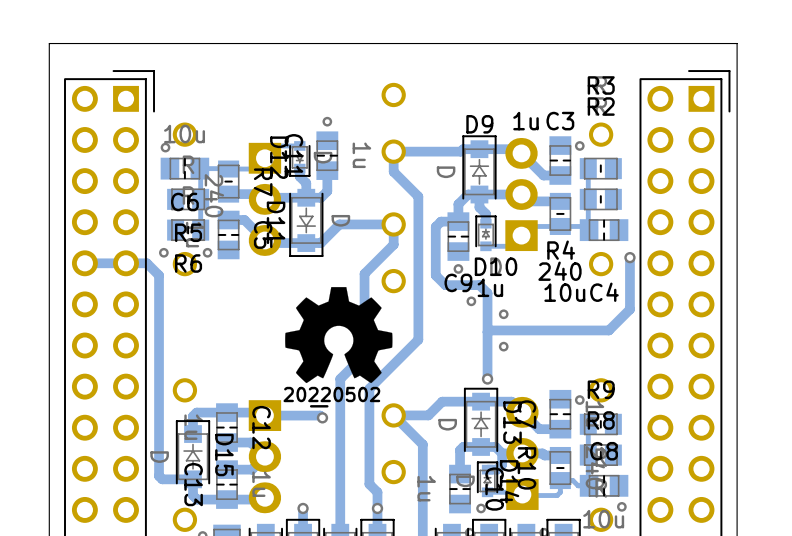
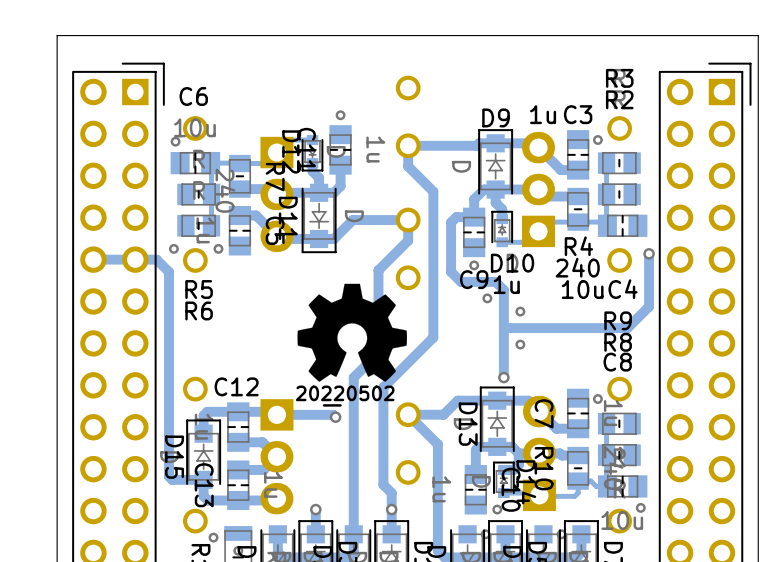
C6 name position: C6 (184, 202) -> C6 (193, 96)
R5 name position: R5 (188, 232) -> R5 (199, 289)
R6 name position: R6 (188, 263) -> R6 (199, 310)
R9 name position: R9 (601, 389) -> R9 (618, 320)
R8 name position: R8 (601, 420) -> R8 (618, 342)
D13 name position: D13 (512, 422) -> D13 (468, 424)
C12 name rotation: 0° (261, 427) -> 90° counterclockwise (236, 386)
C8 name position: C8 (604, 451) -> C8 (617, 362)
D15 name position: D15 (224, 455) -> D15 (174, 457)

